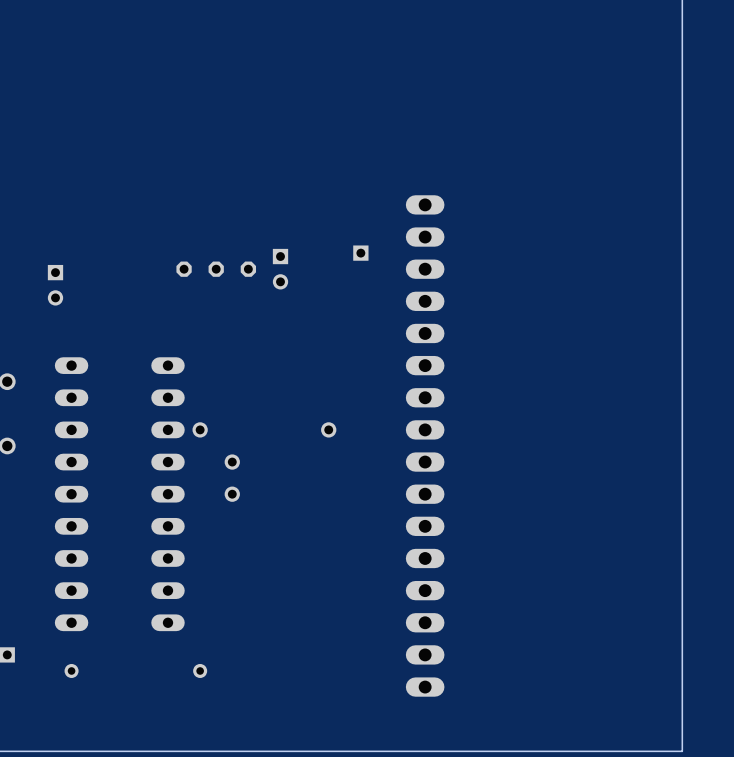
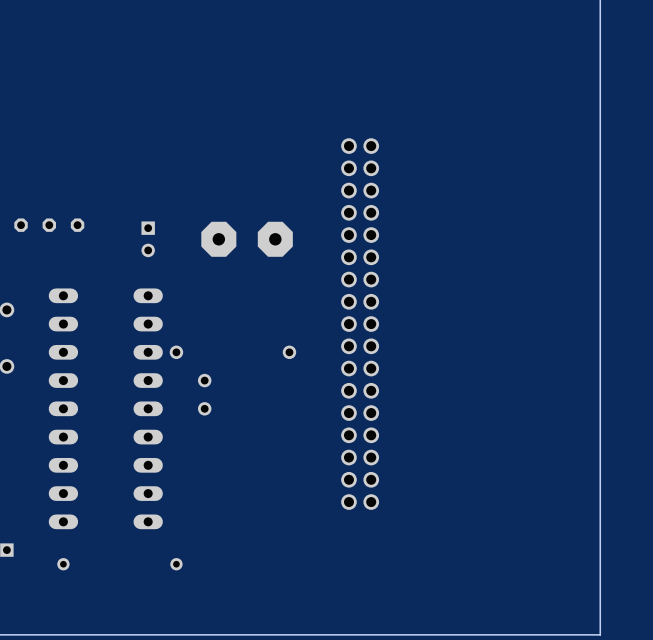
part: (360, 253) -> none
part footprint: [47, 264, 64, 306] -> [14, 218, 85, 232]
part: (216, 269) -> none
part position: (280, 269) -> (148, 239)
part: none -> (247, 239)
part: none -> (360, 324)
part: (425, 445) -> none

